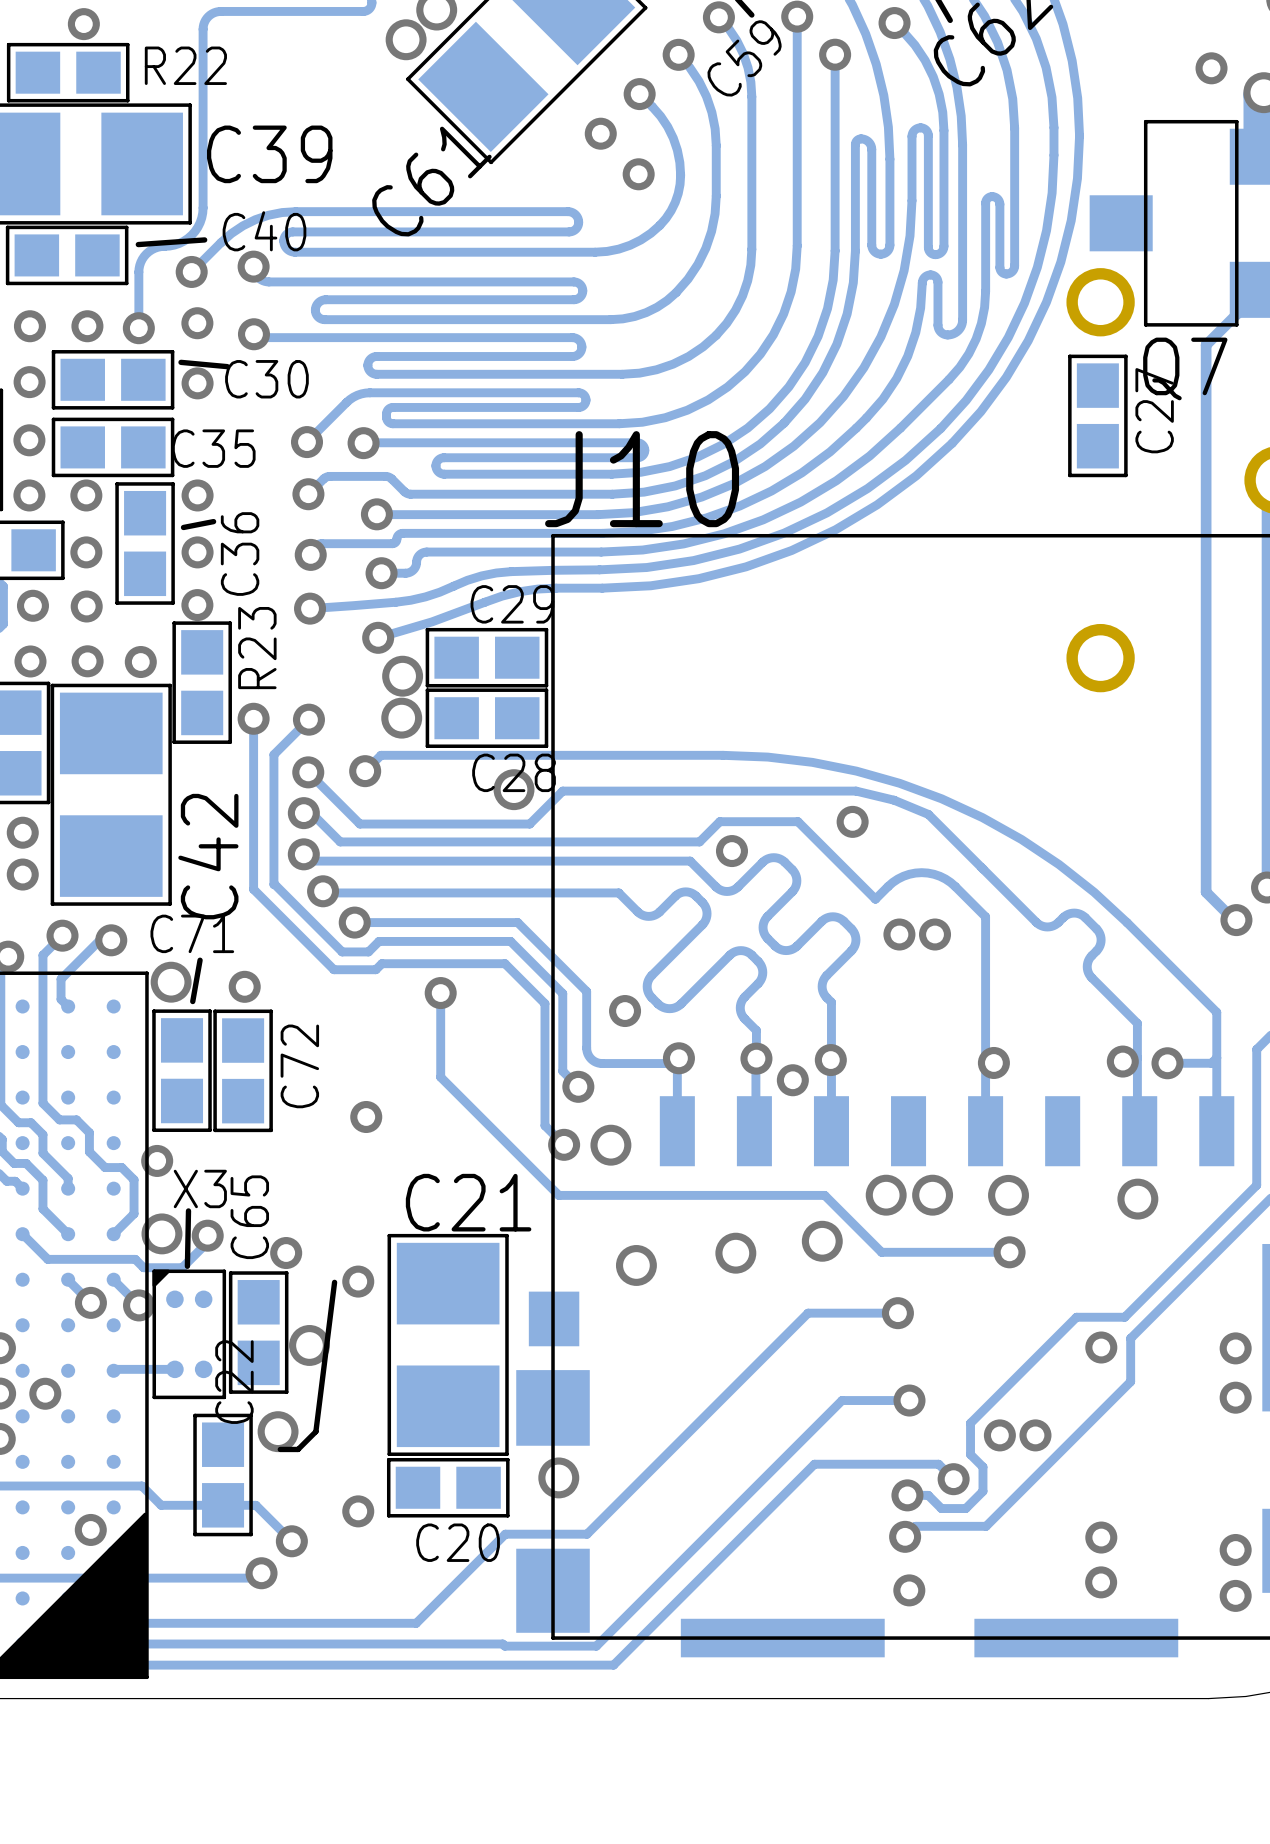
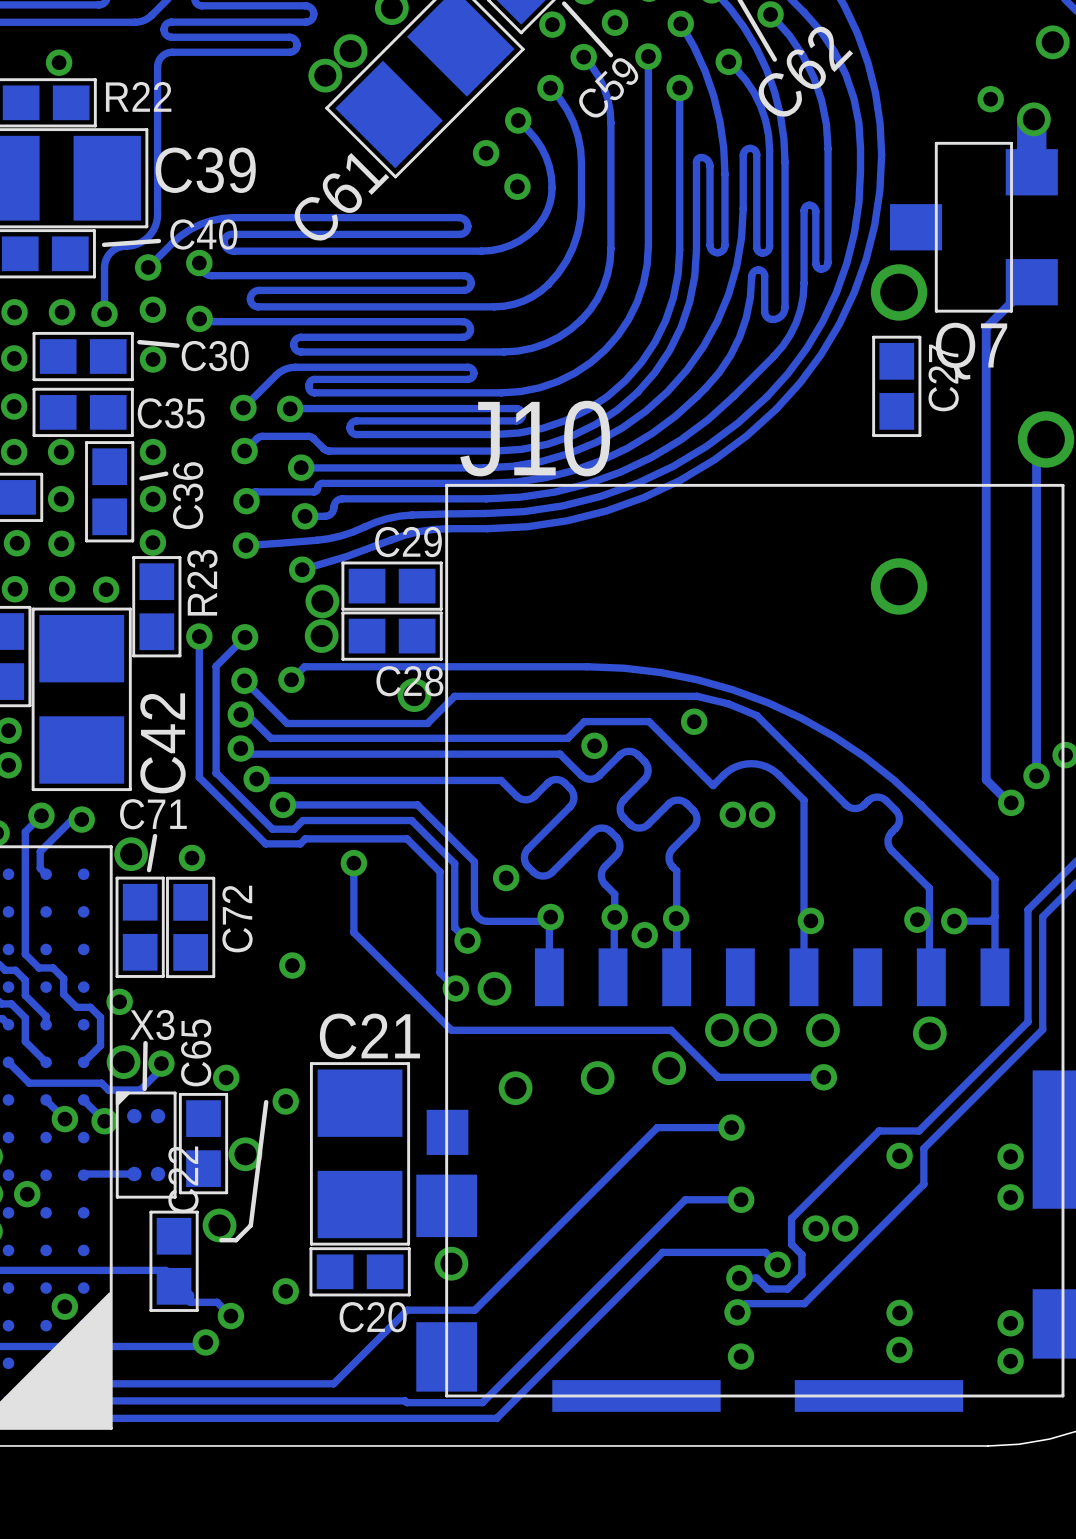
track: (141, 1486) (161, 1505) (255, 1505) (275, 1524) -> (107, 1270) (165, 1270) (190, 1295) (190, 1302) (217, 1302)

